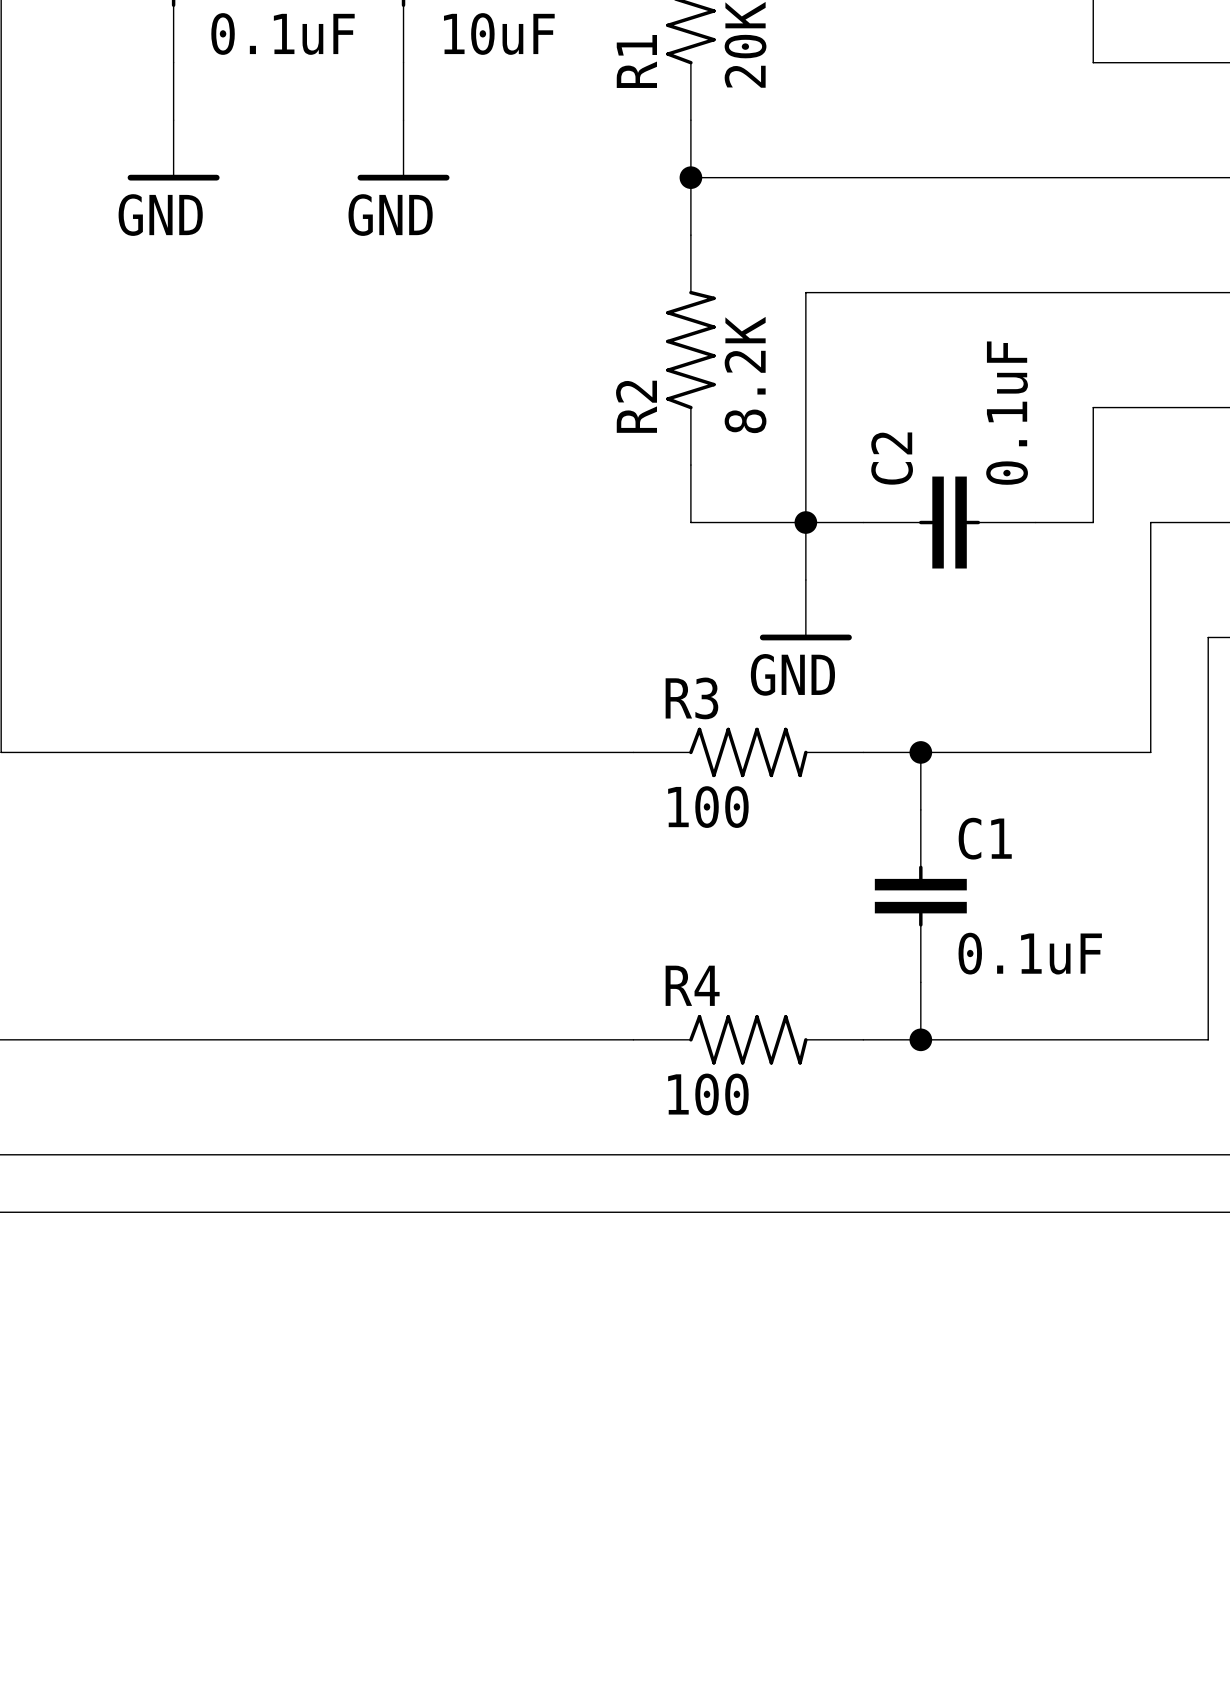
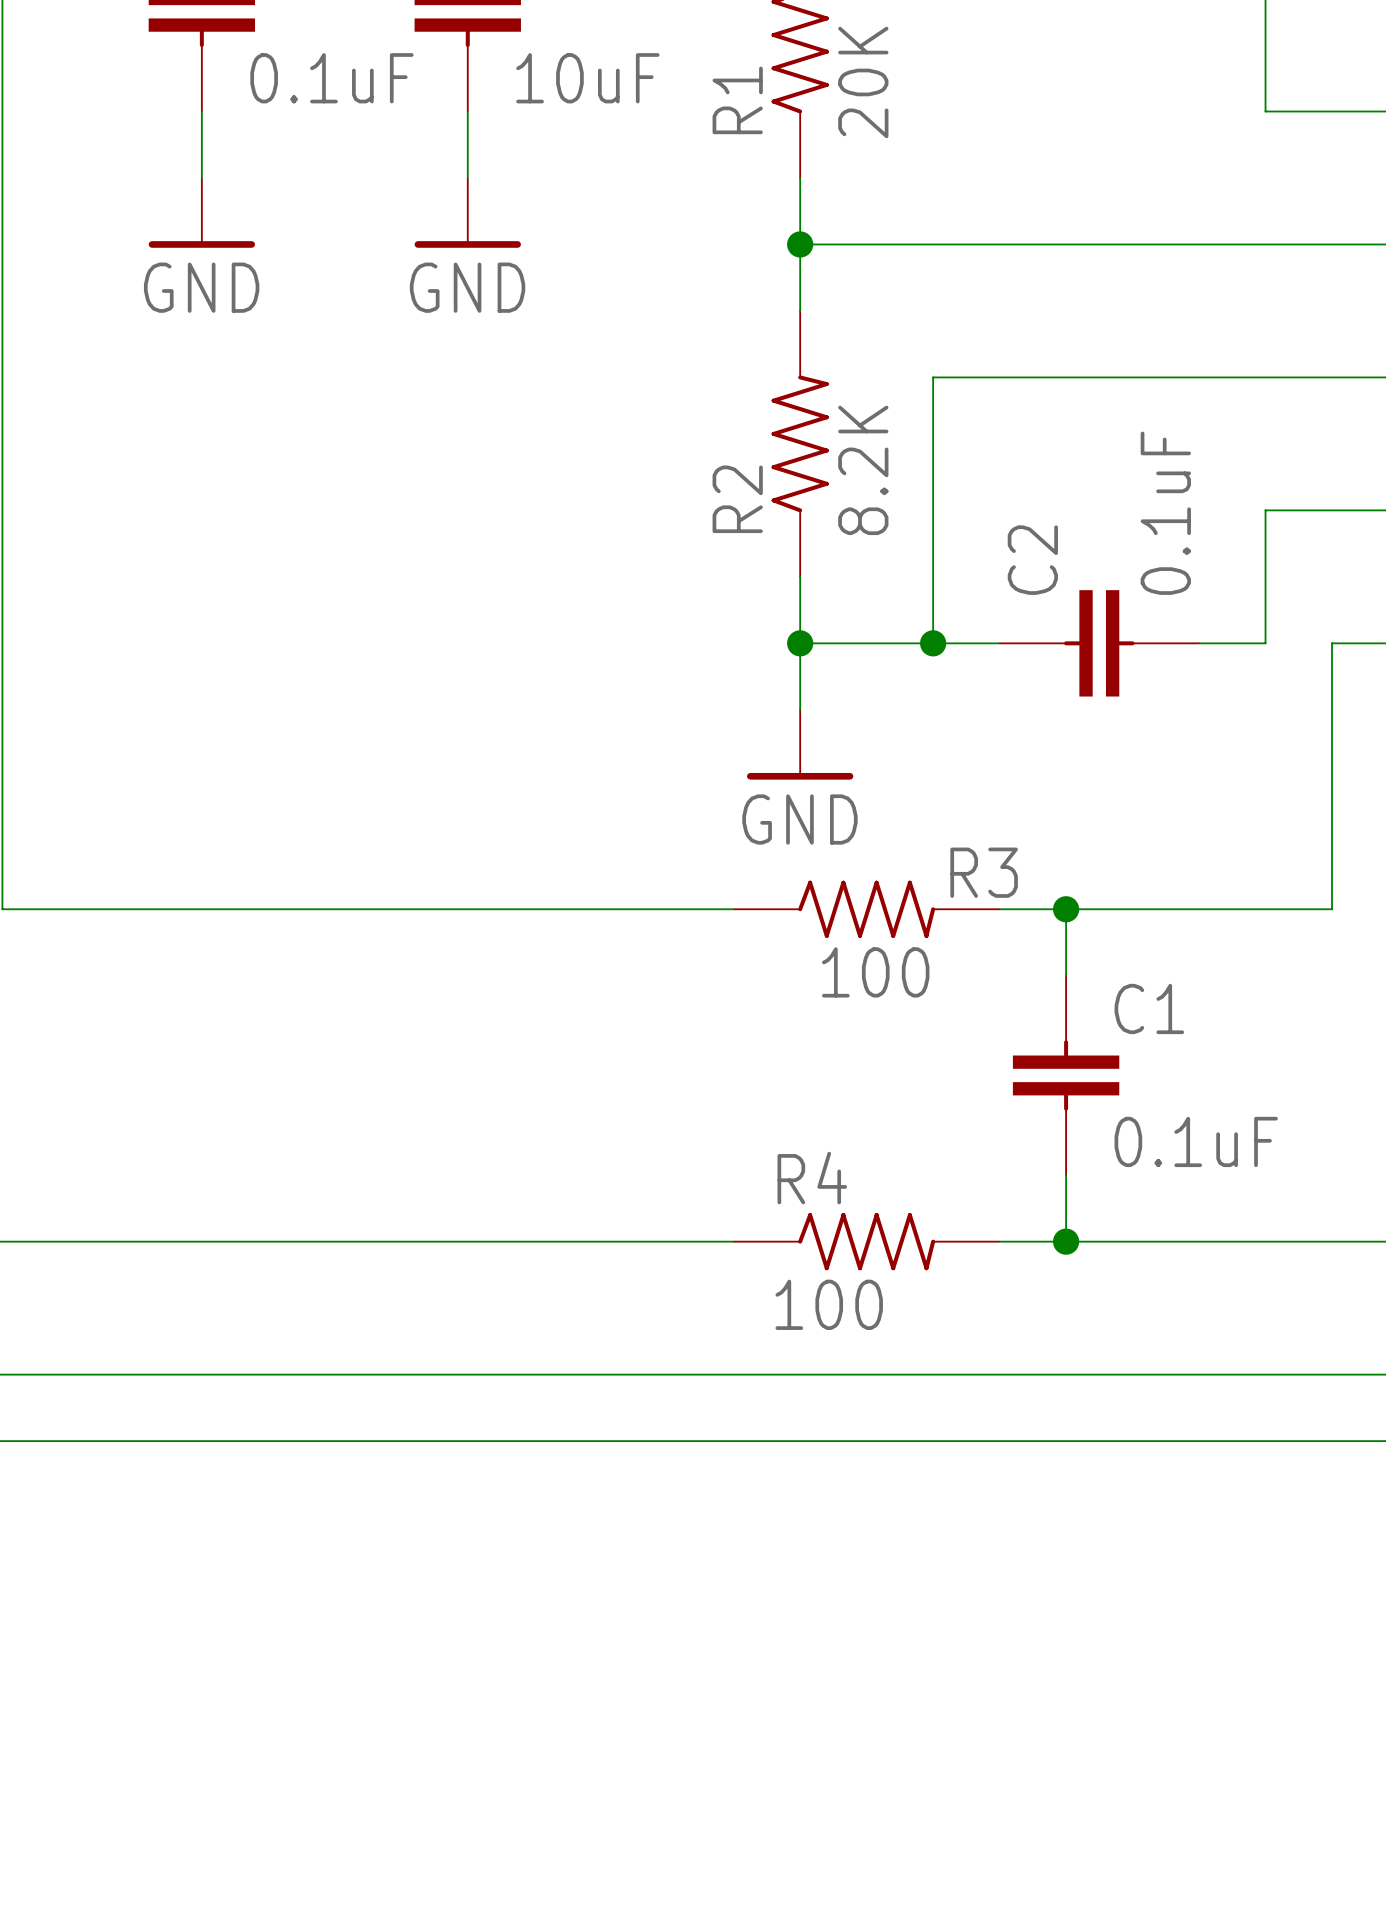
junction: none -> (800, 643)
wire: (805, 522) (805, 580) -> (800, 643) (800, 709)
power symbol position: GND (805, 610) -> GND (800, 744)
R3 name position: R3 (691, 698) -> R3 (984, 872)
R3 value position: 100 (708, 807) -> 100 (875, 972)

